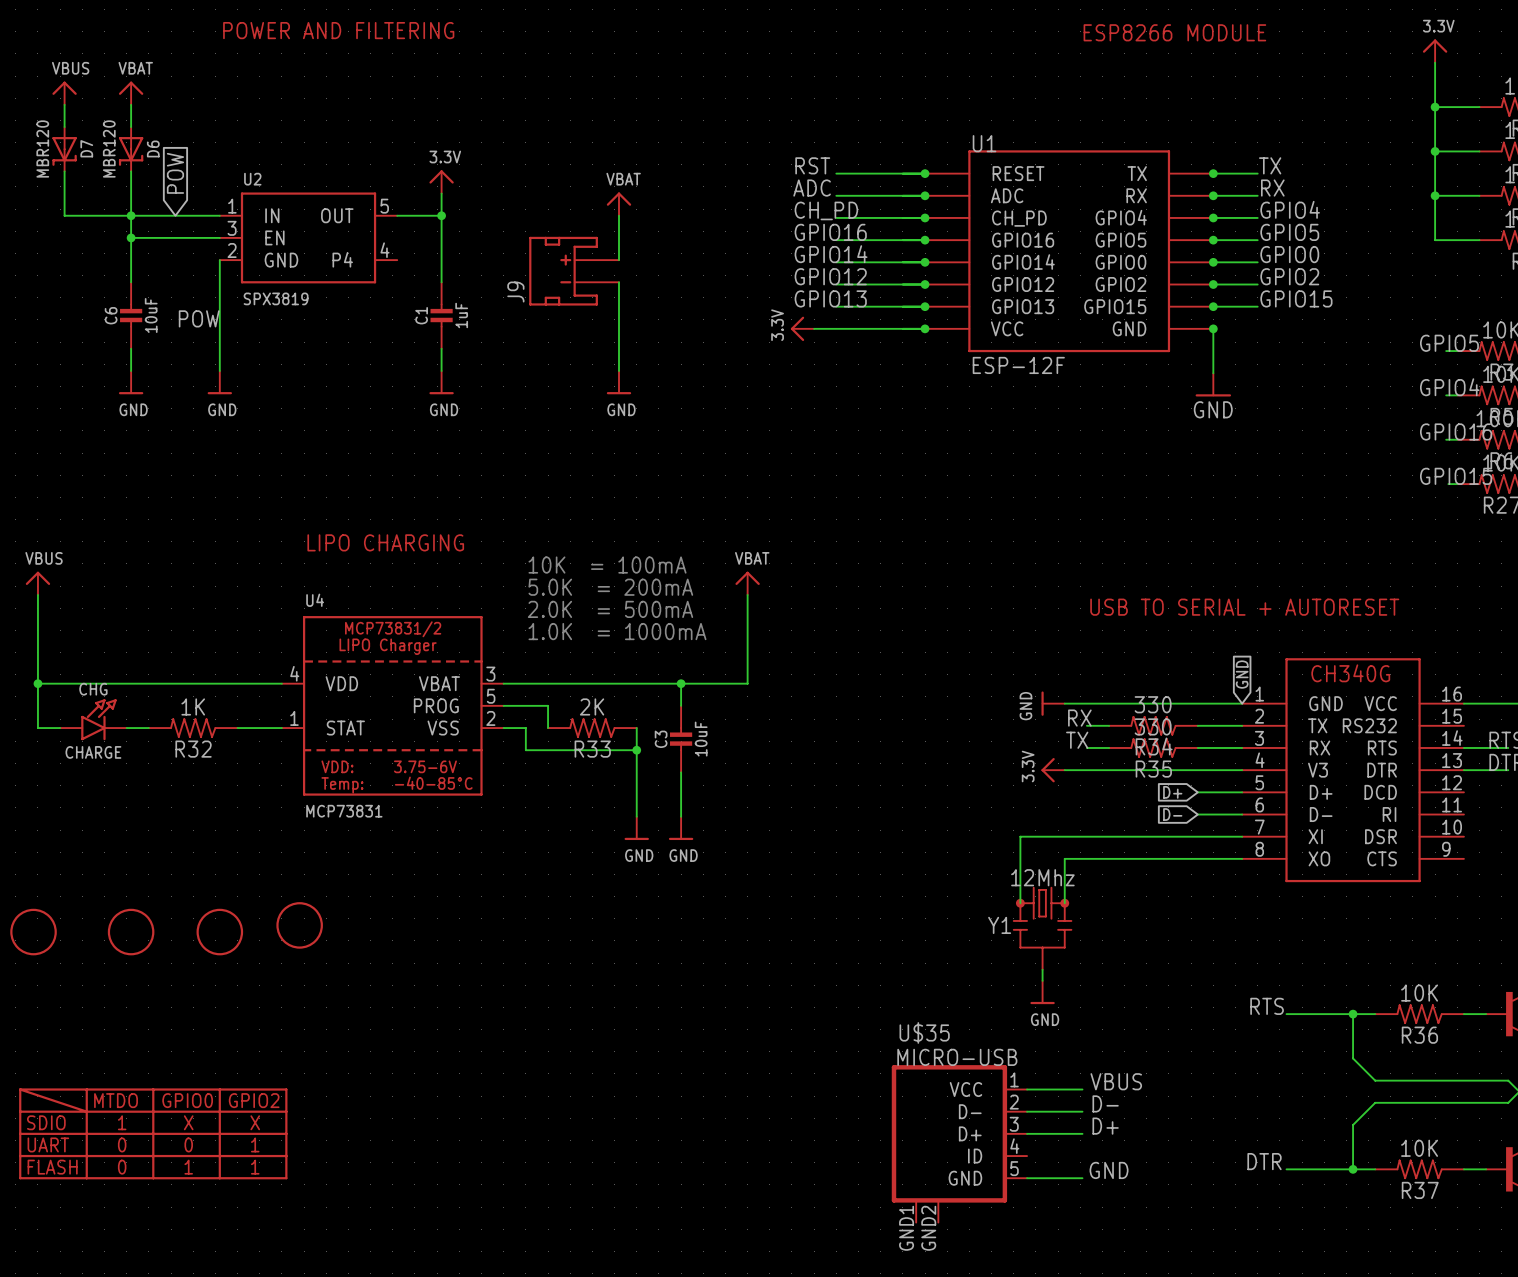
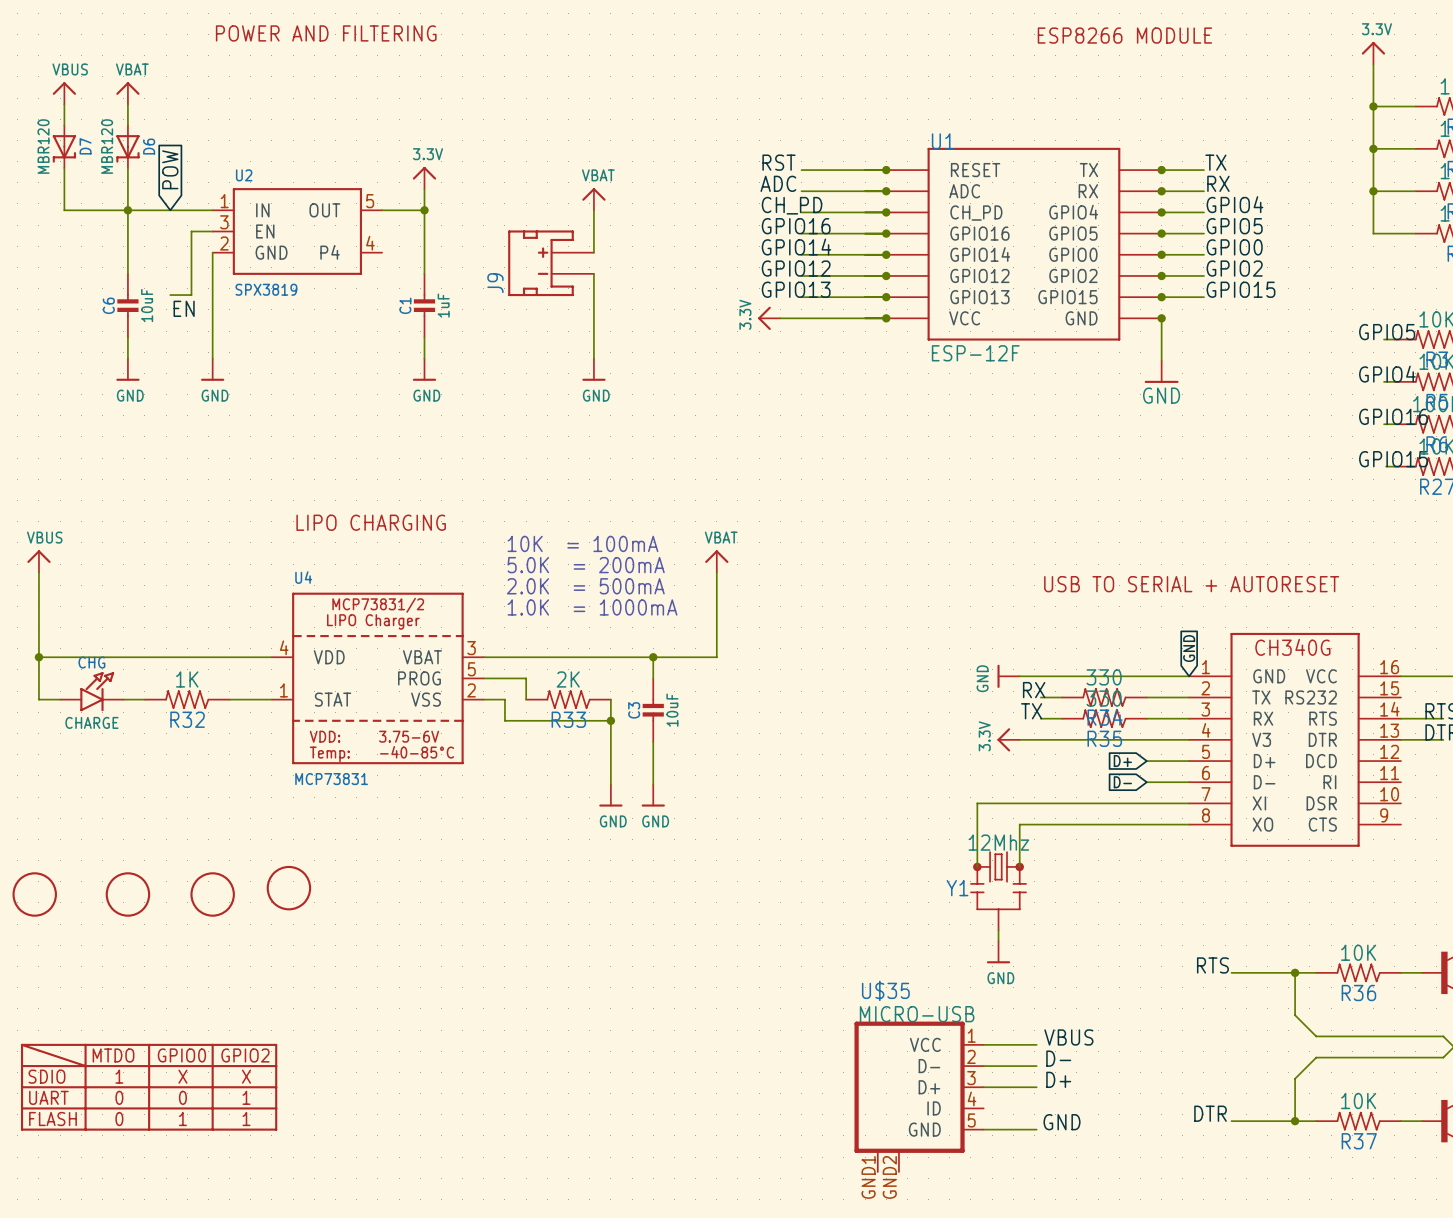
wire: (131, 237) (197, 237) -> (170, 295) (191, 295) (191, 231)
junction: (131, 237) -> none
label: POW (199, 318) -> EN (184, 308)

